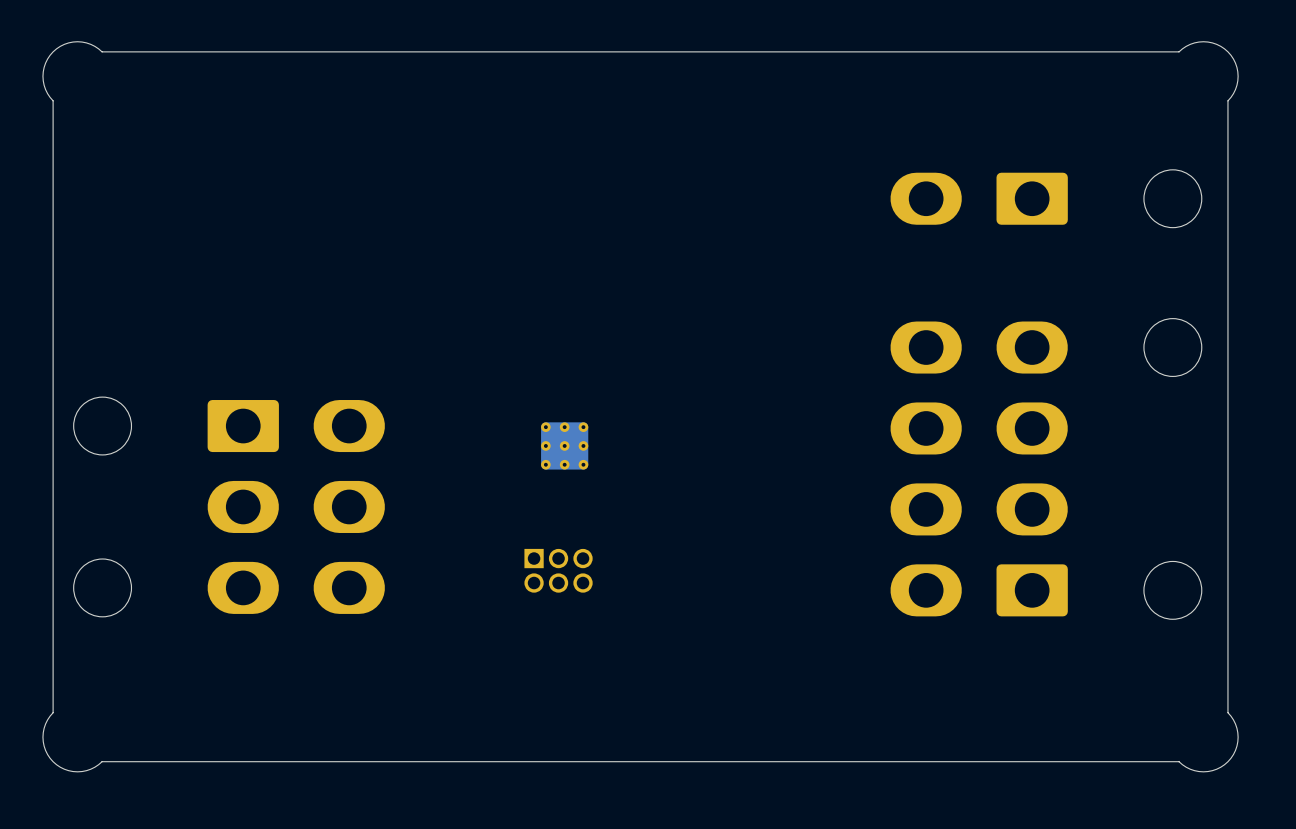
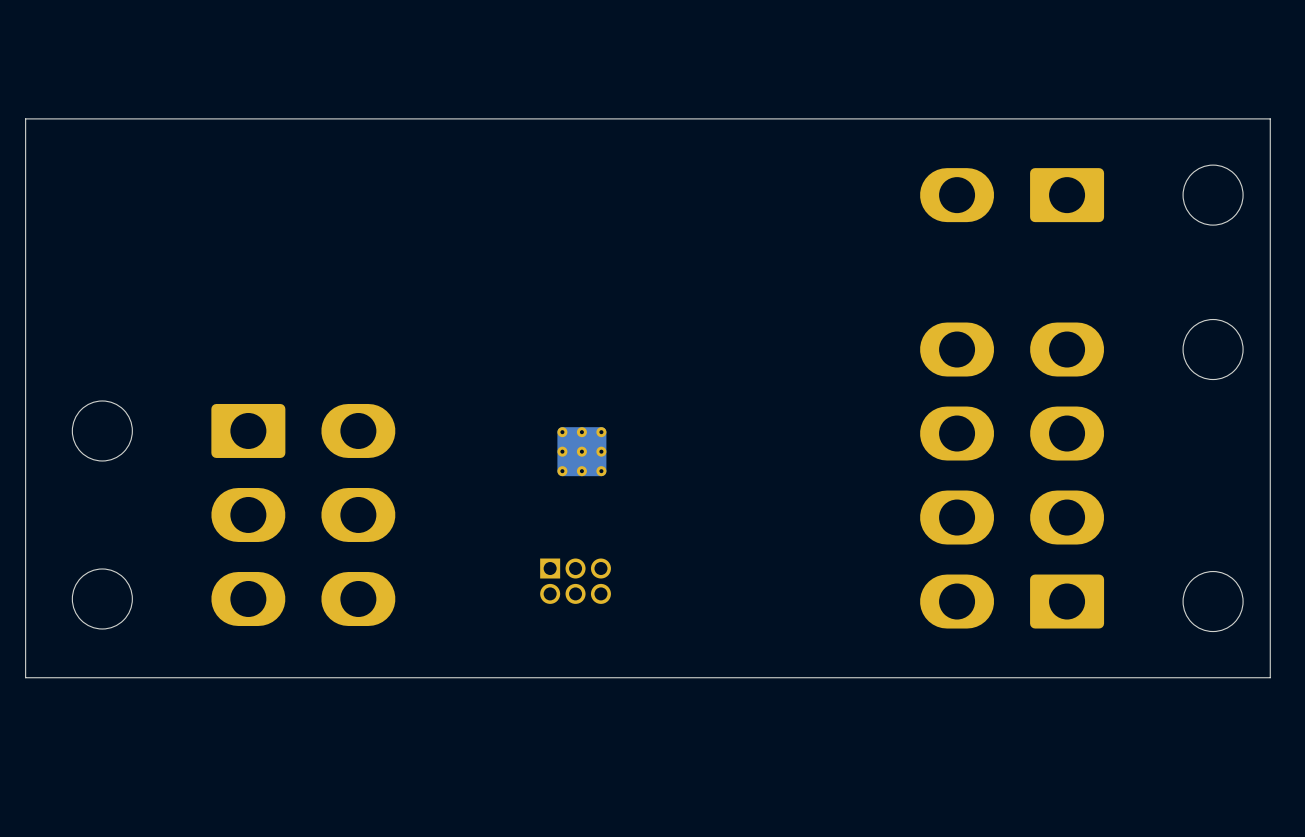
board edge: (1227, 125) (1227, 100) (1236, 85) (1236, 67) (1227, 51) (1216, 44) (1208, 42) (1190, 44) (1179, 51) (102, 51) (90, 44) (82, 42) (68, 42) (60, 46) (47, 59) (42, 76) (45, 89) (53, 100) (53, 712) (45, 723) (42, 737) (45, 750) (53, 761) (64, 769) (77, 771) (90, 769) (102, 761) (1179, 761) (1190, 769) (1203, 771) (1212, 770) (1224, 764) (1233, 754) (1236, 746) (1236, 728) (1227, 712) (1227, 663) -> (1270, 118) (25, 118) (25, 677) (1270, 677)

